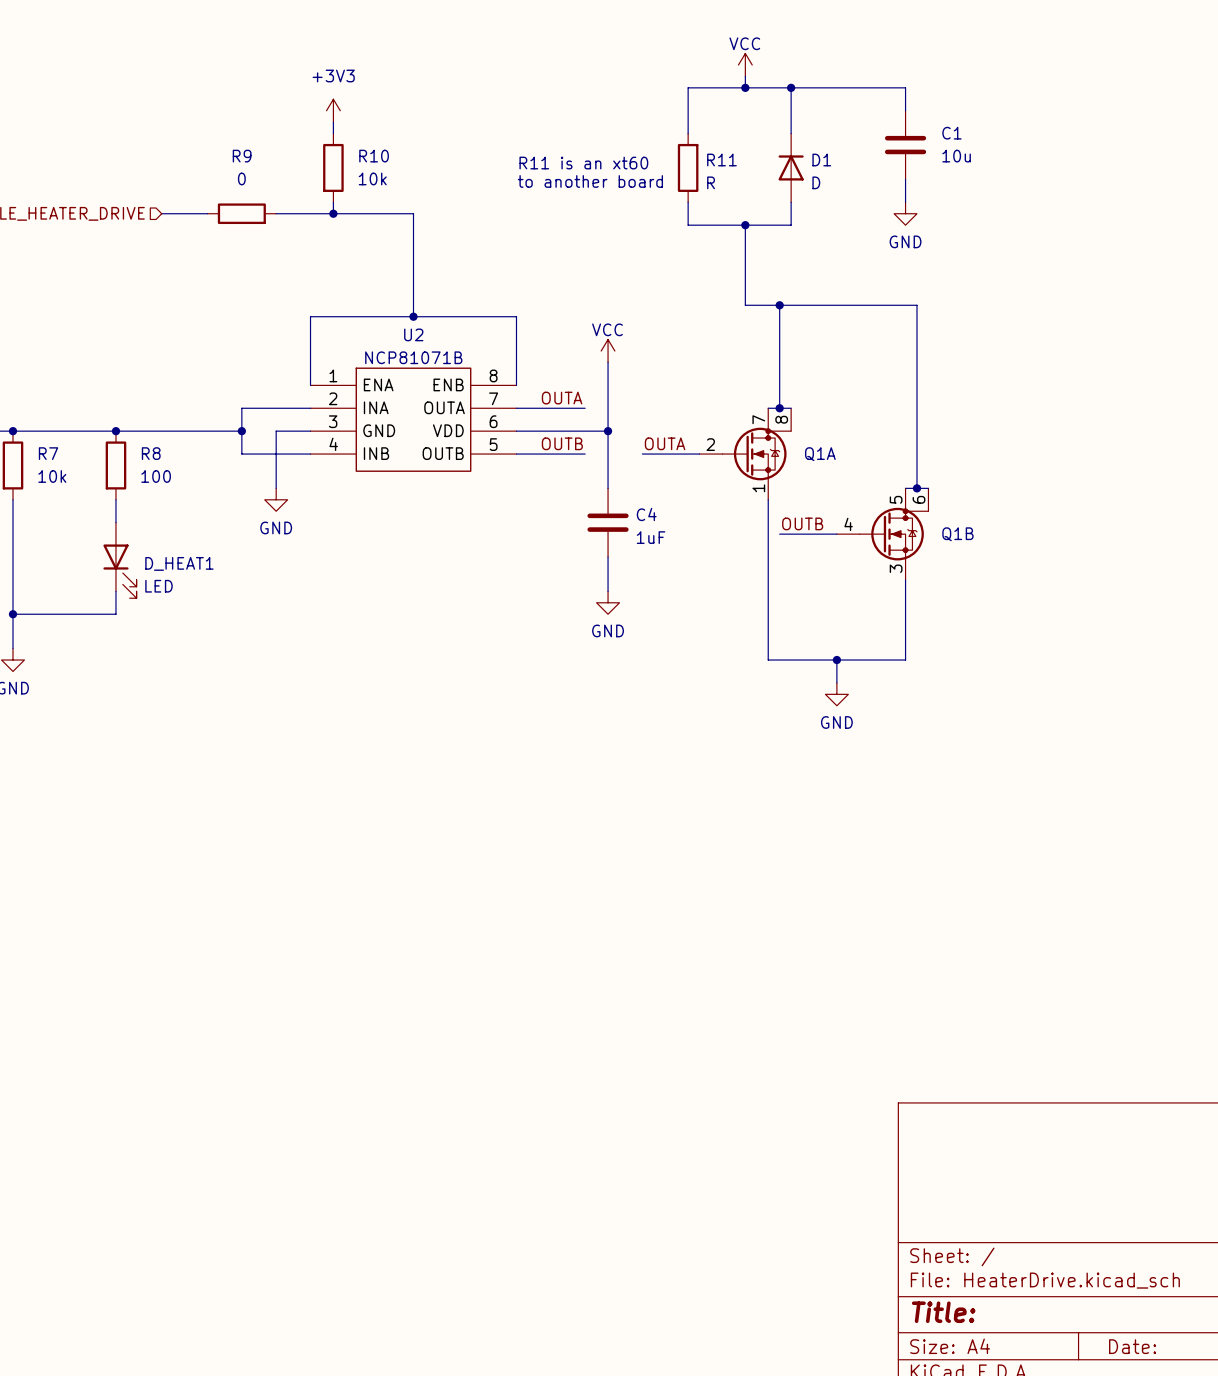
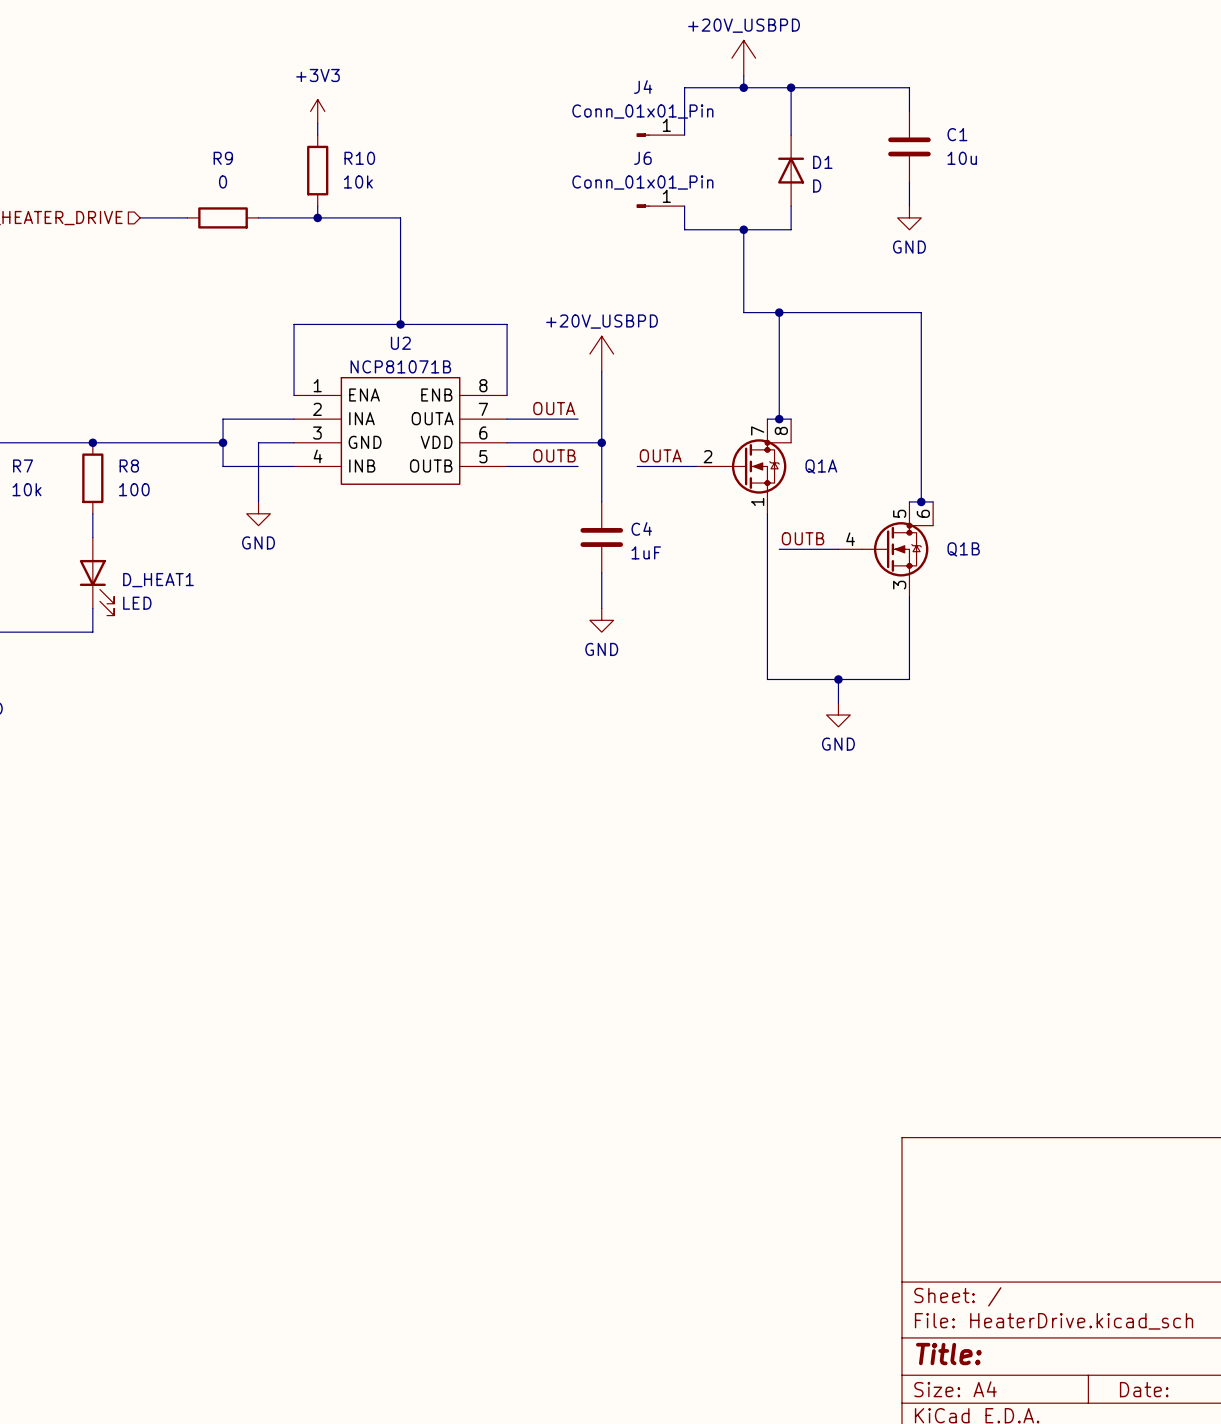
power symbol: VCC (745, 64) -> +20V_USBPD (743, 58)
J4: none -> Conn_01x01_Pin (660, 135)
text: R11 is an xt60 (583, 163) -> none
R11: R (688, 167) -> none
text: to another board (590, 181) -> none
J6: none -> Conn_01x01_Pin (660, 206)
power symbol: VCC (608, 351) -> +20V_USBPD (601, 354)

